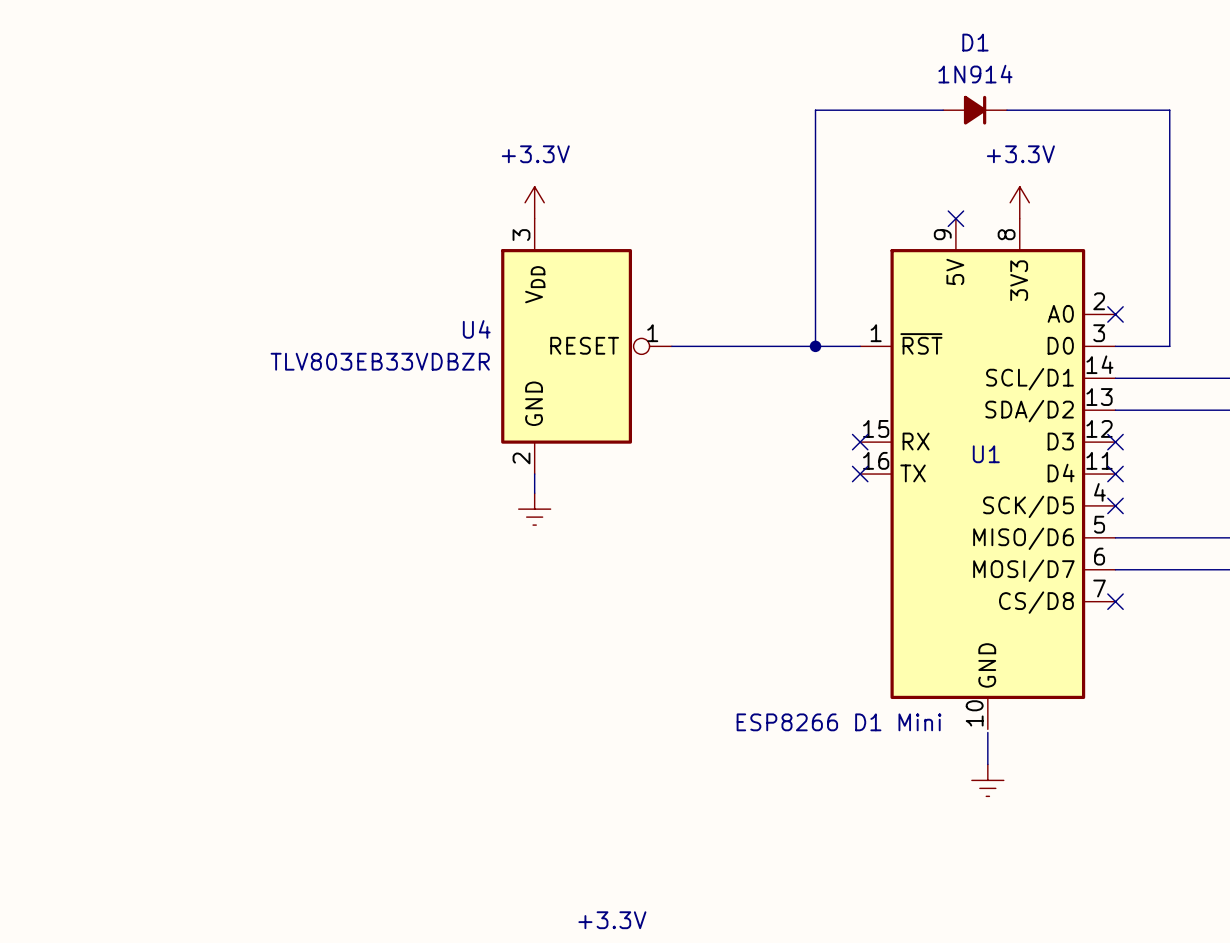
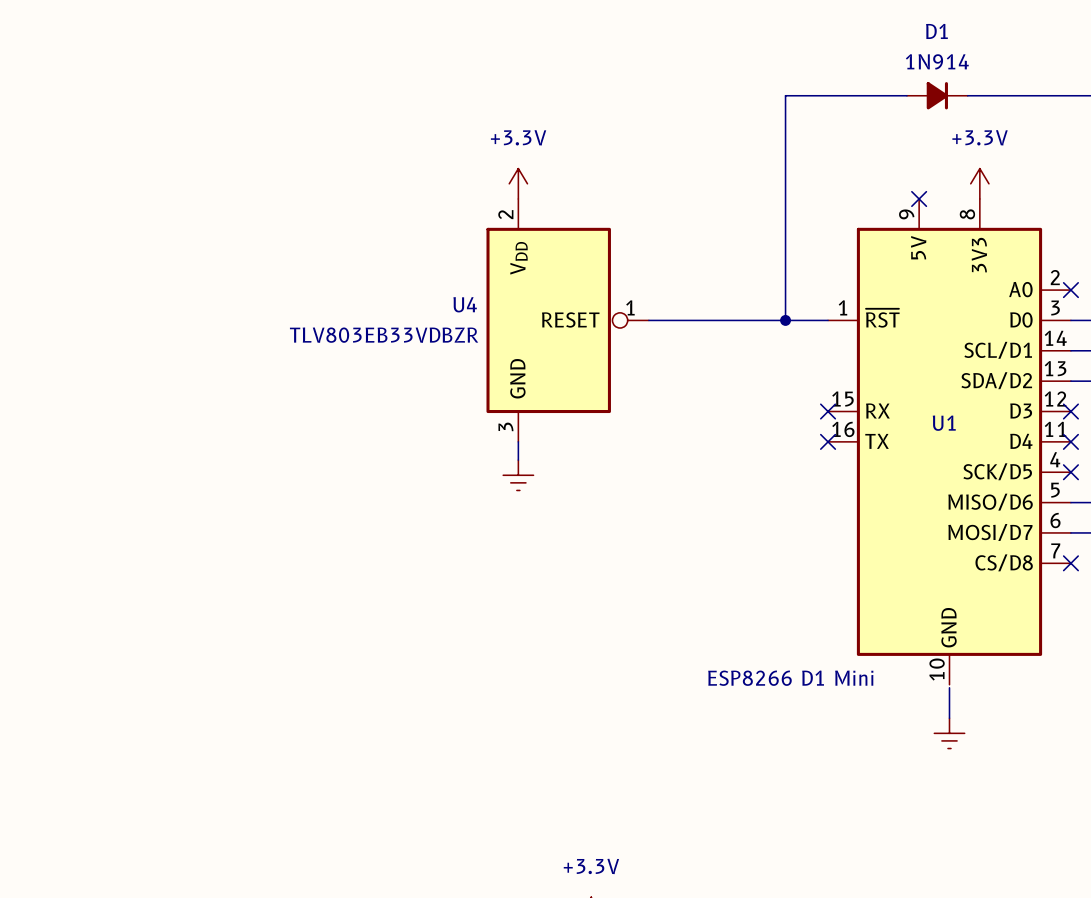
U4 pin number: 3 (521, 235) -> 2 (505, 214)
U4 pin number: 2 (521, 458) -> 3 (505, 426)

